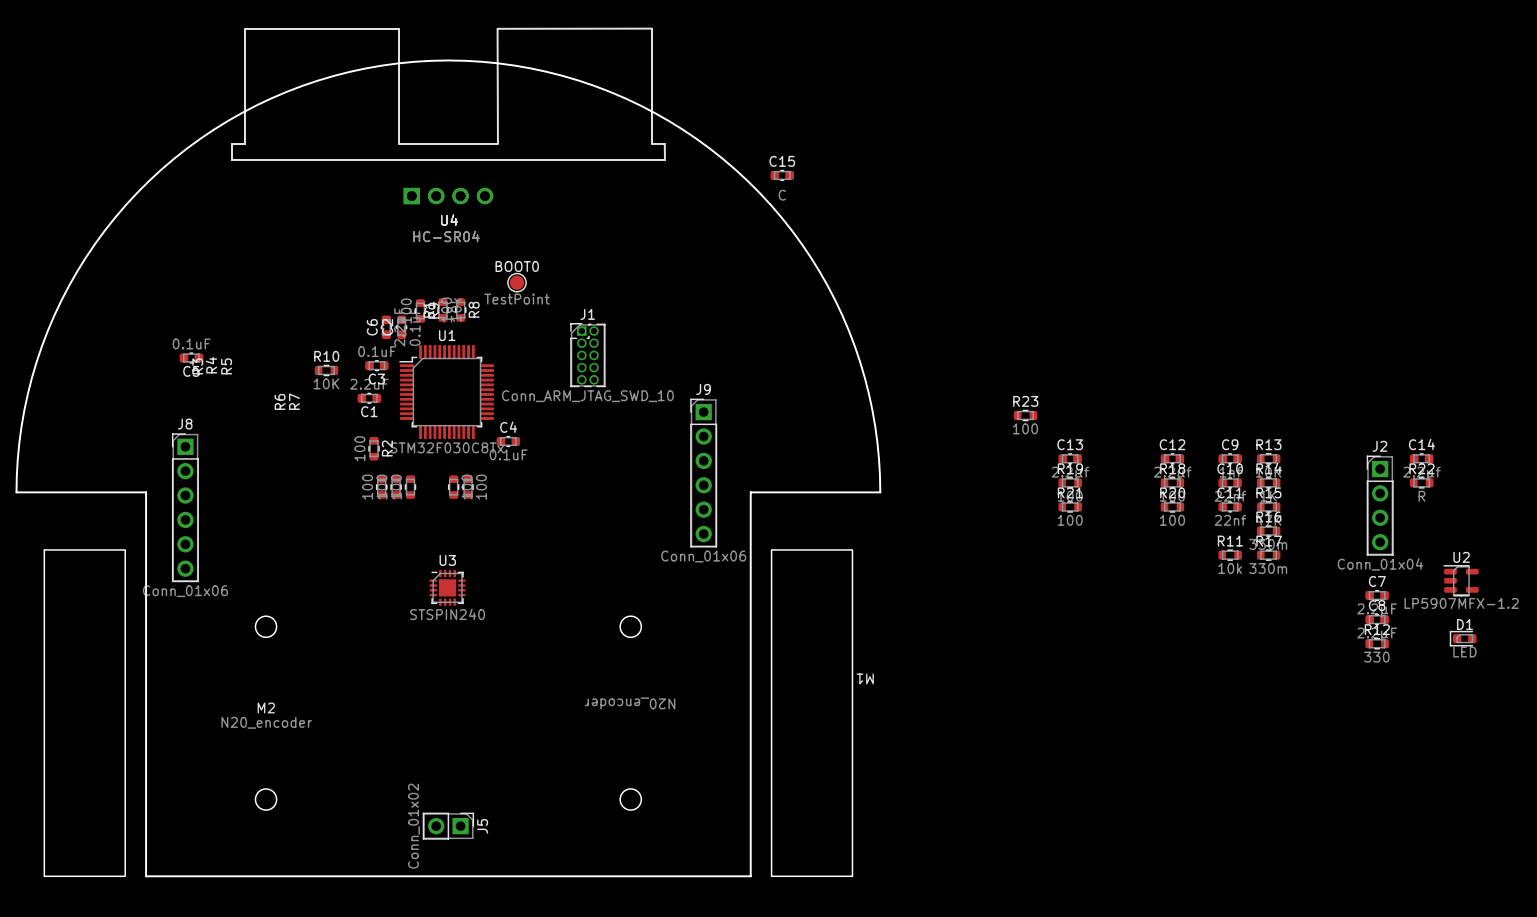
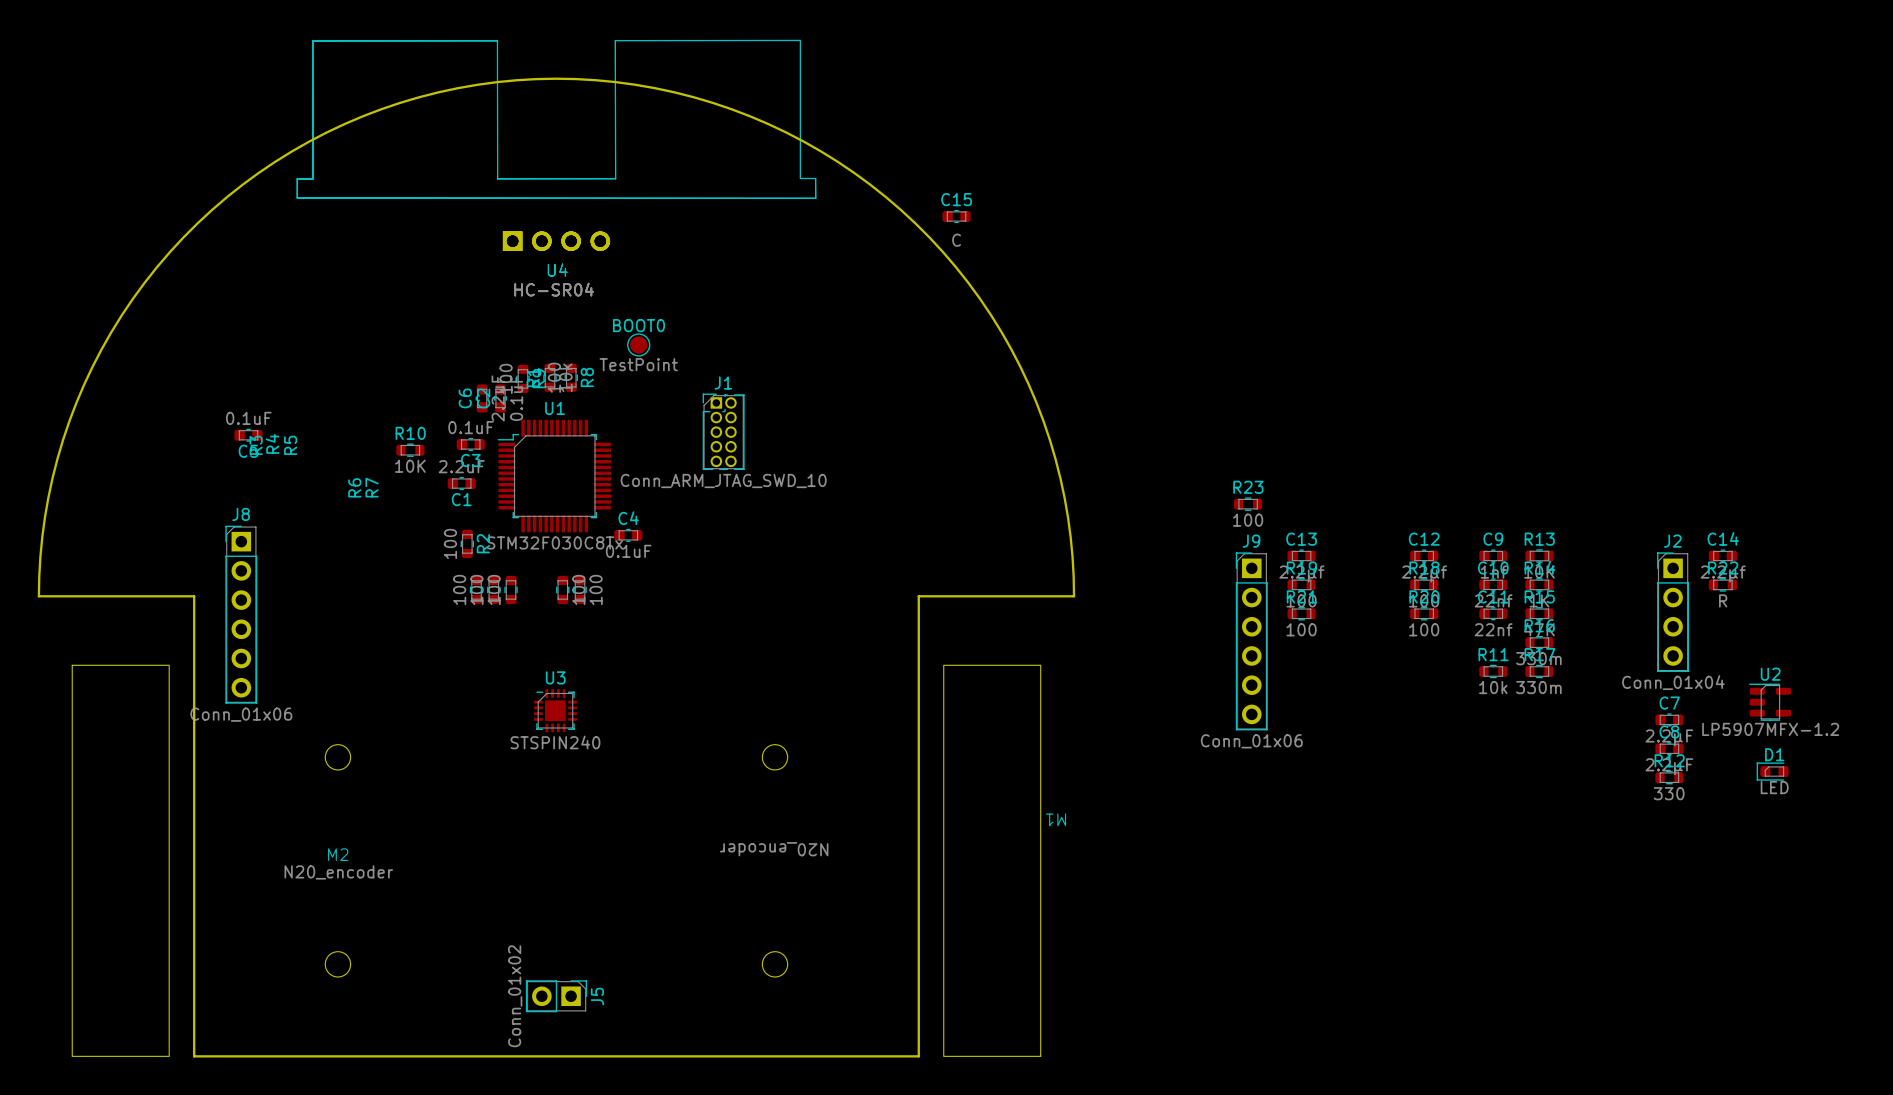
J9 position: (703, 473) -> (1251, 641)

